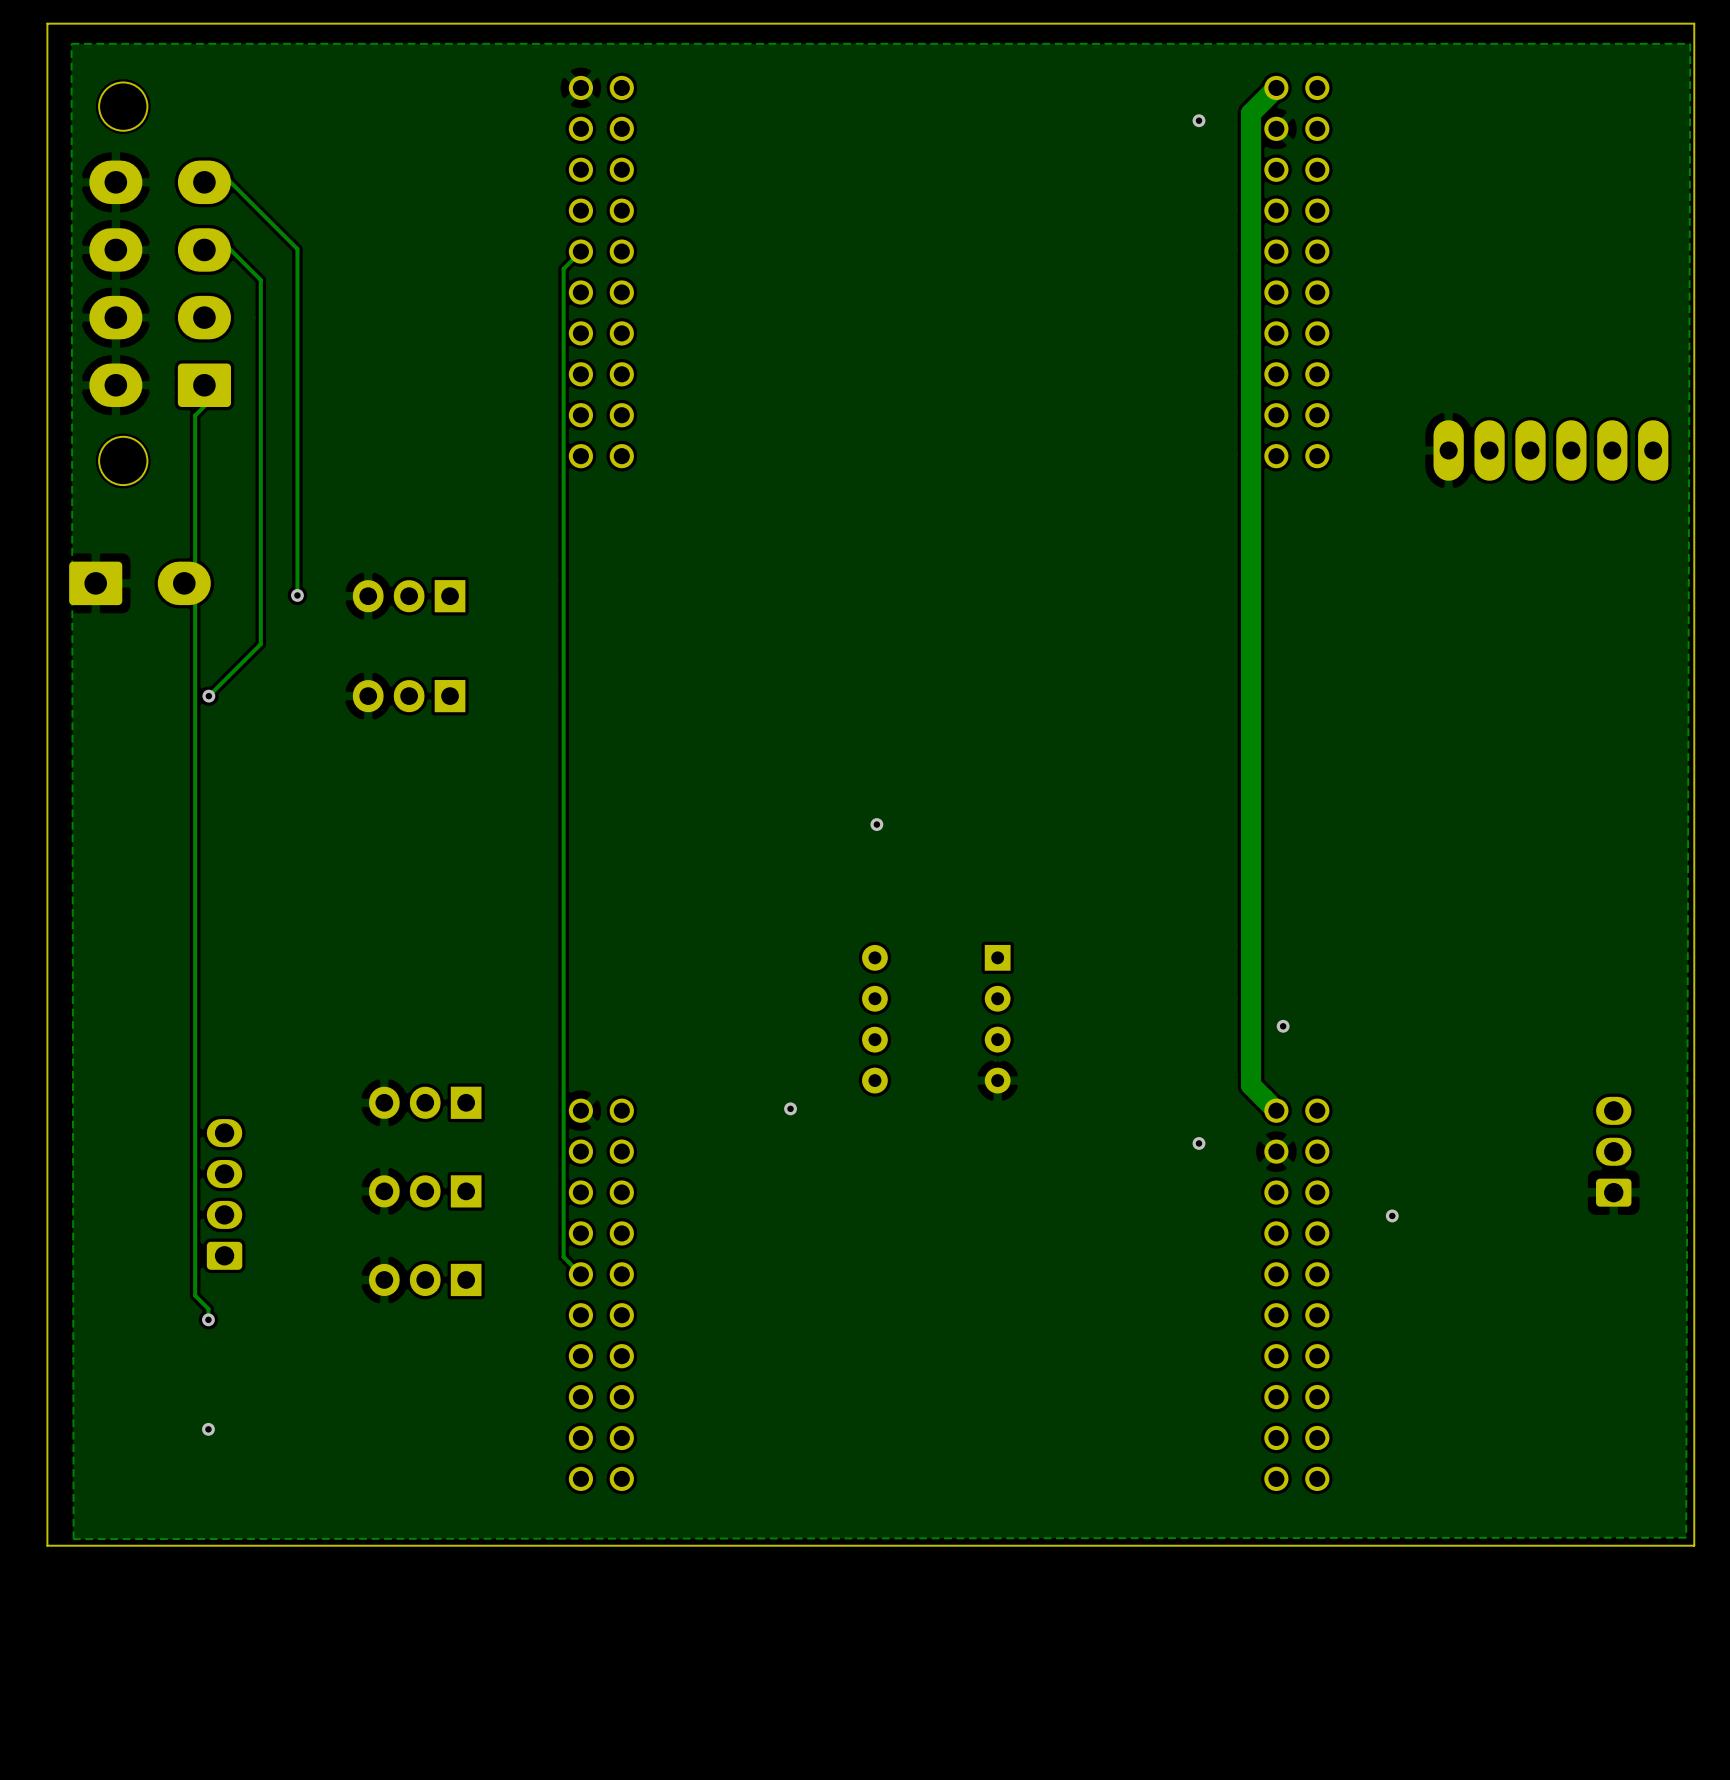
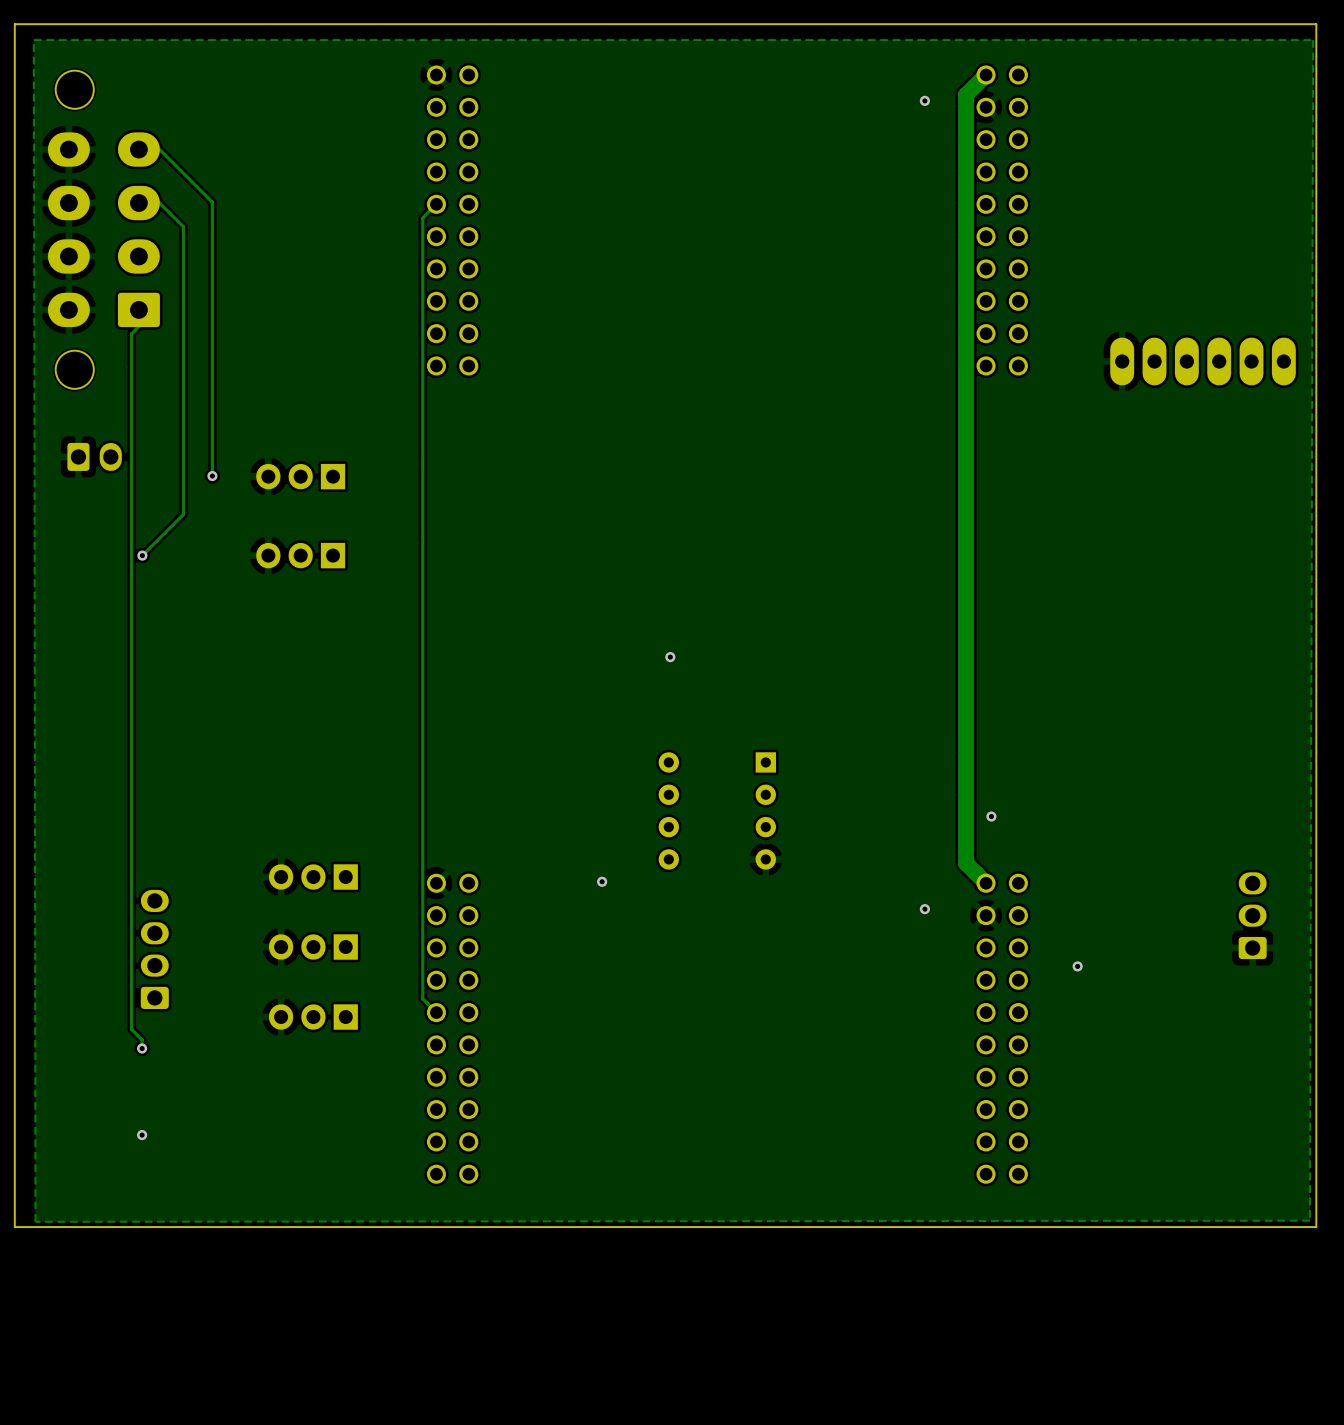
part footprint: [69, 561, 211, 606] -> [67, 442, 122, 471]

